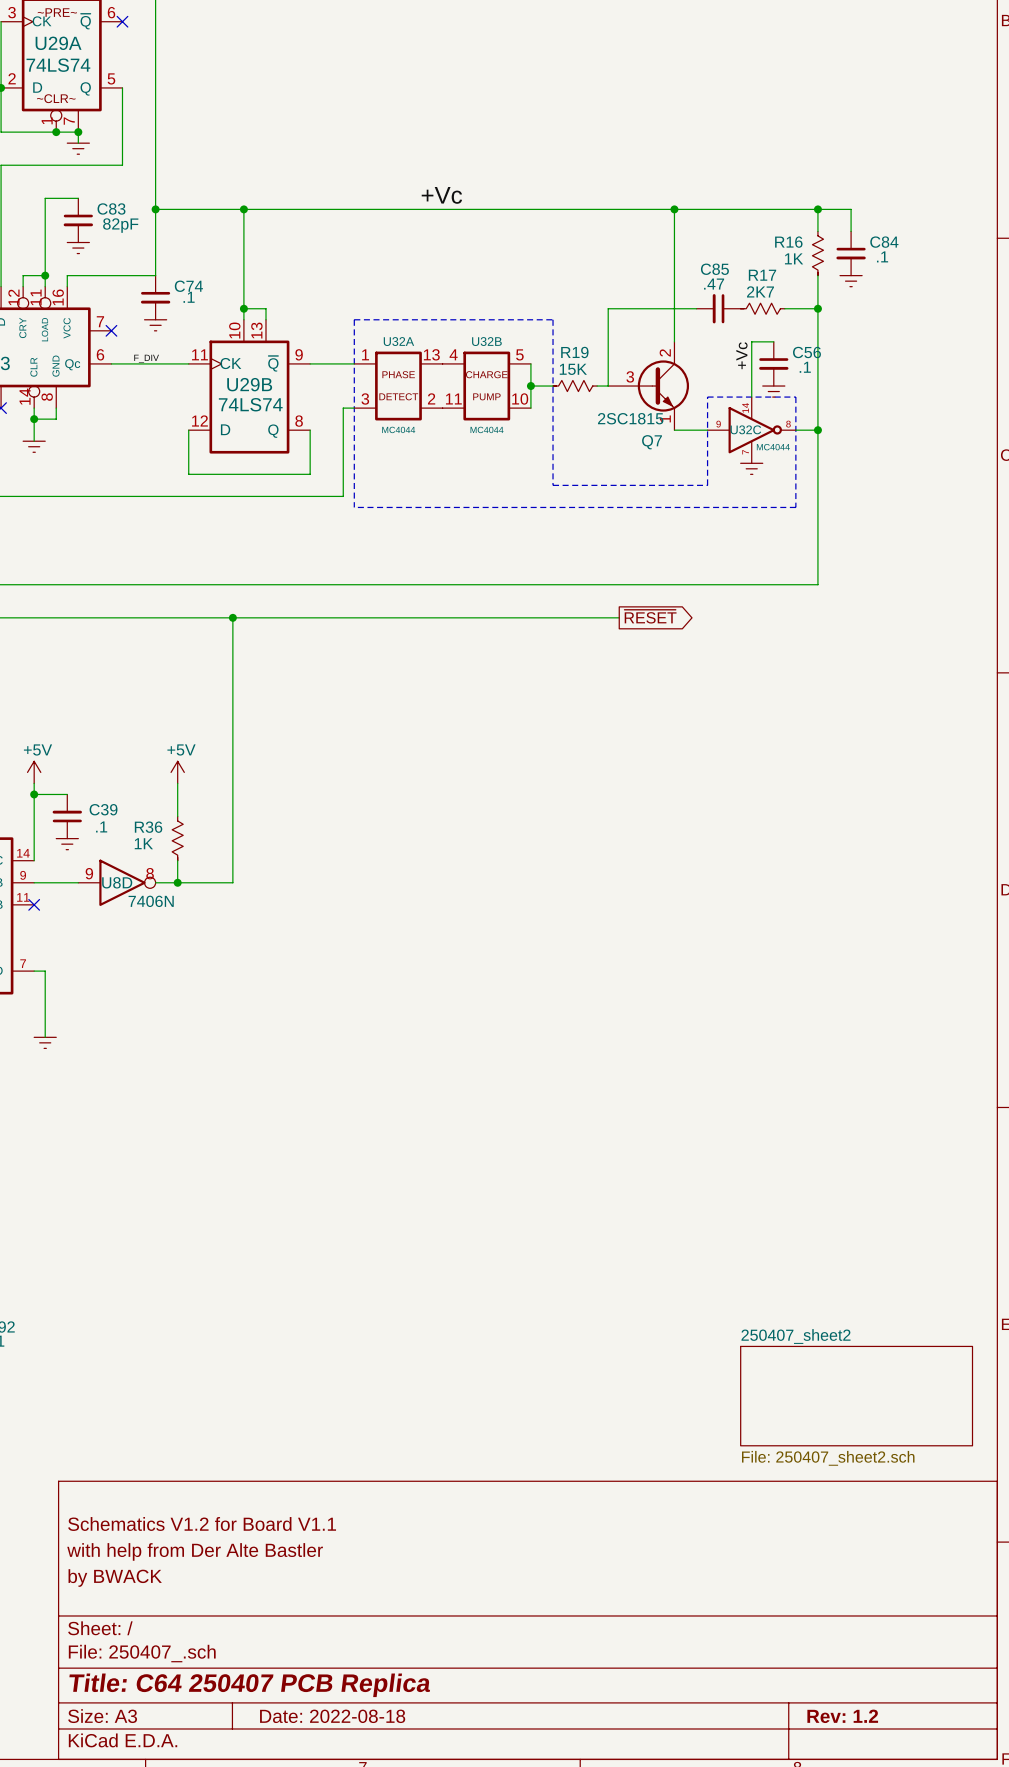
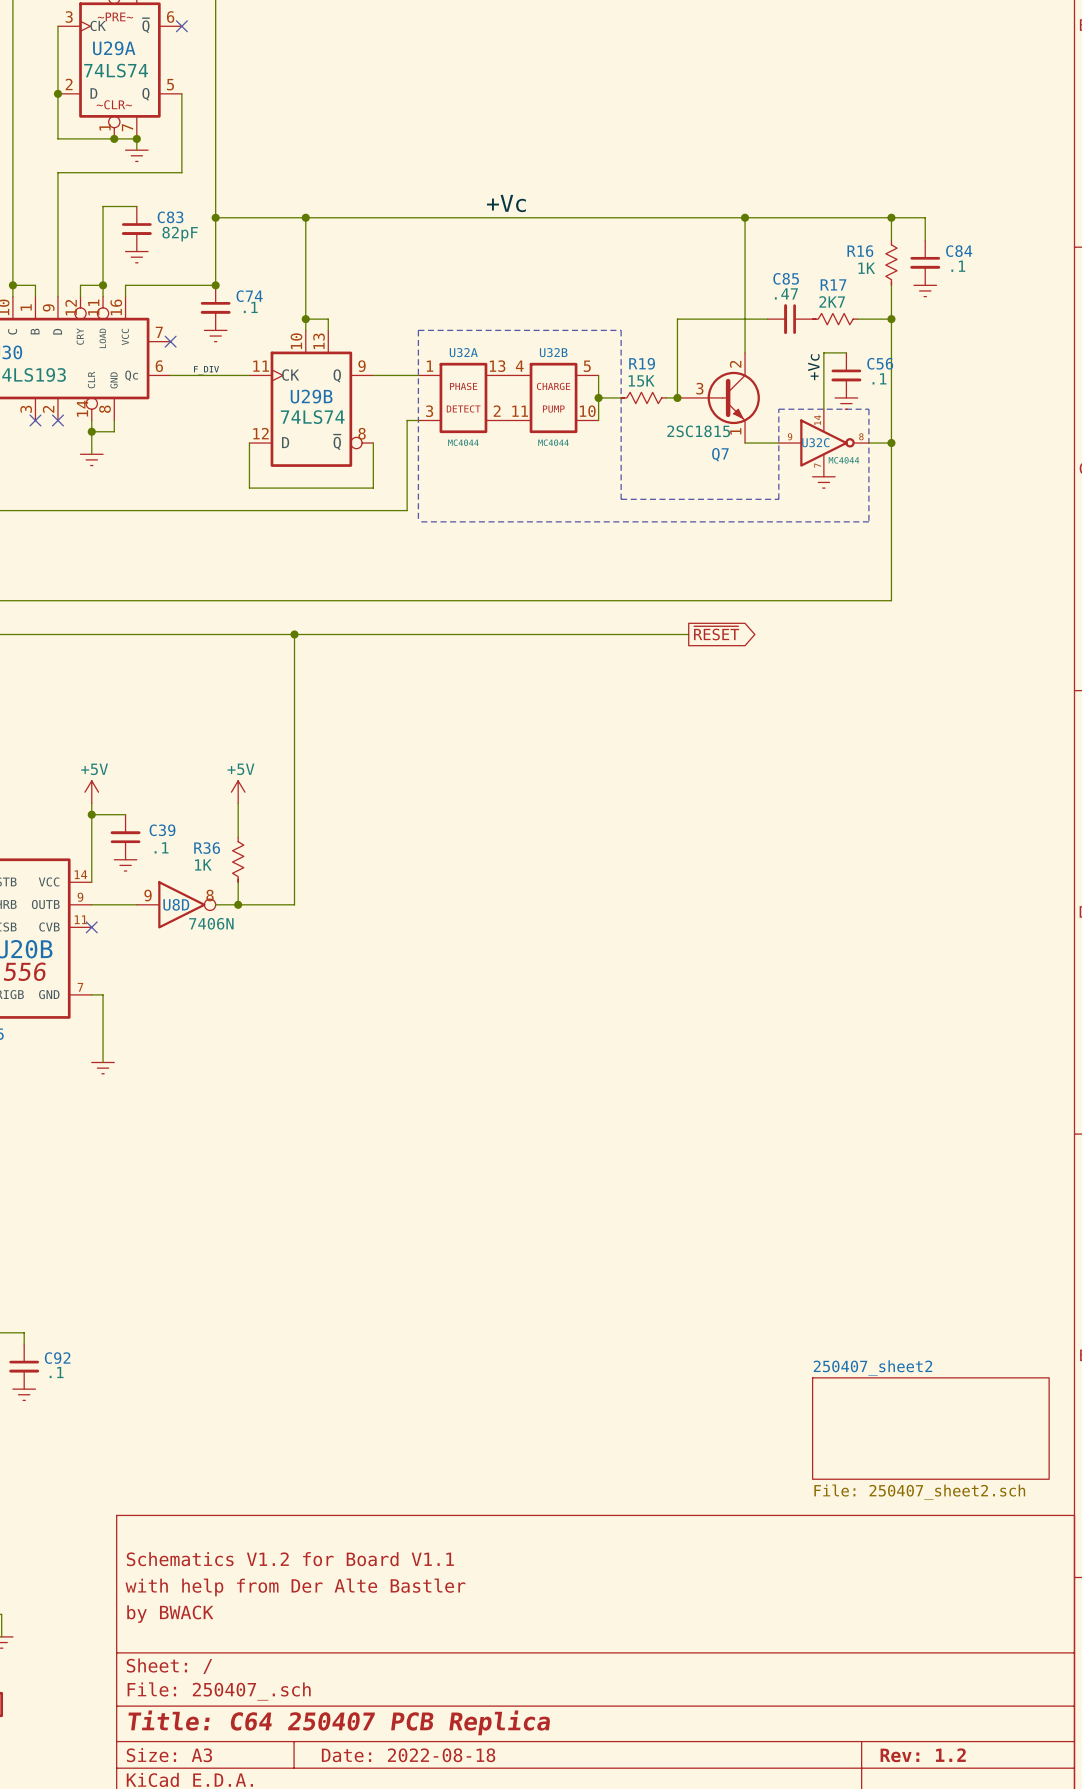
junction: none -> (215, 285)
U29B symbol: [188, 319, 311, 454] -> [249, 330, 374, 467]
junction: none -> (677, 397)

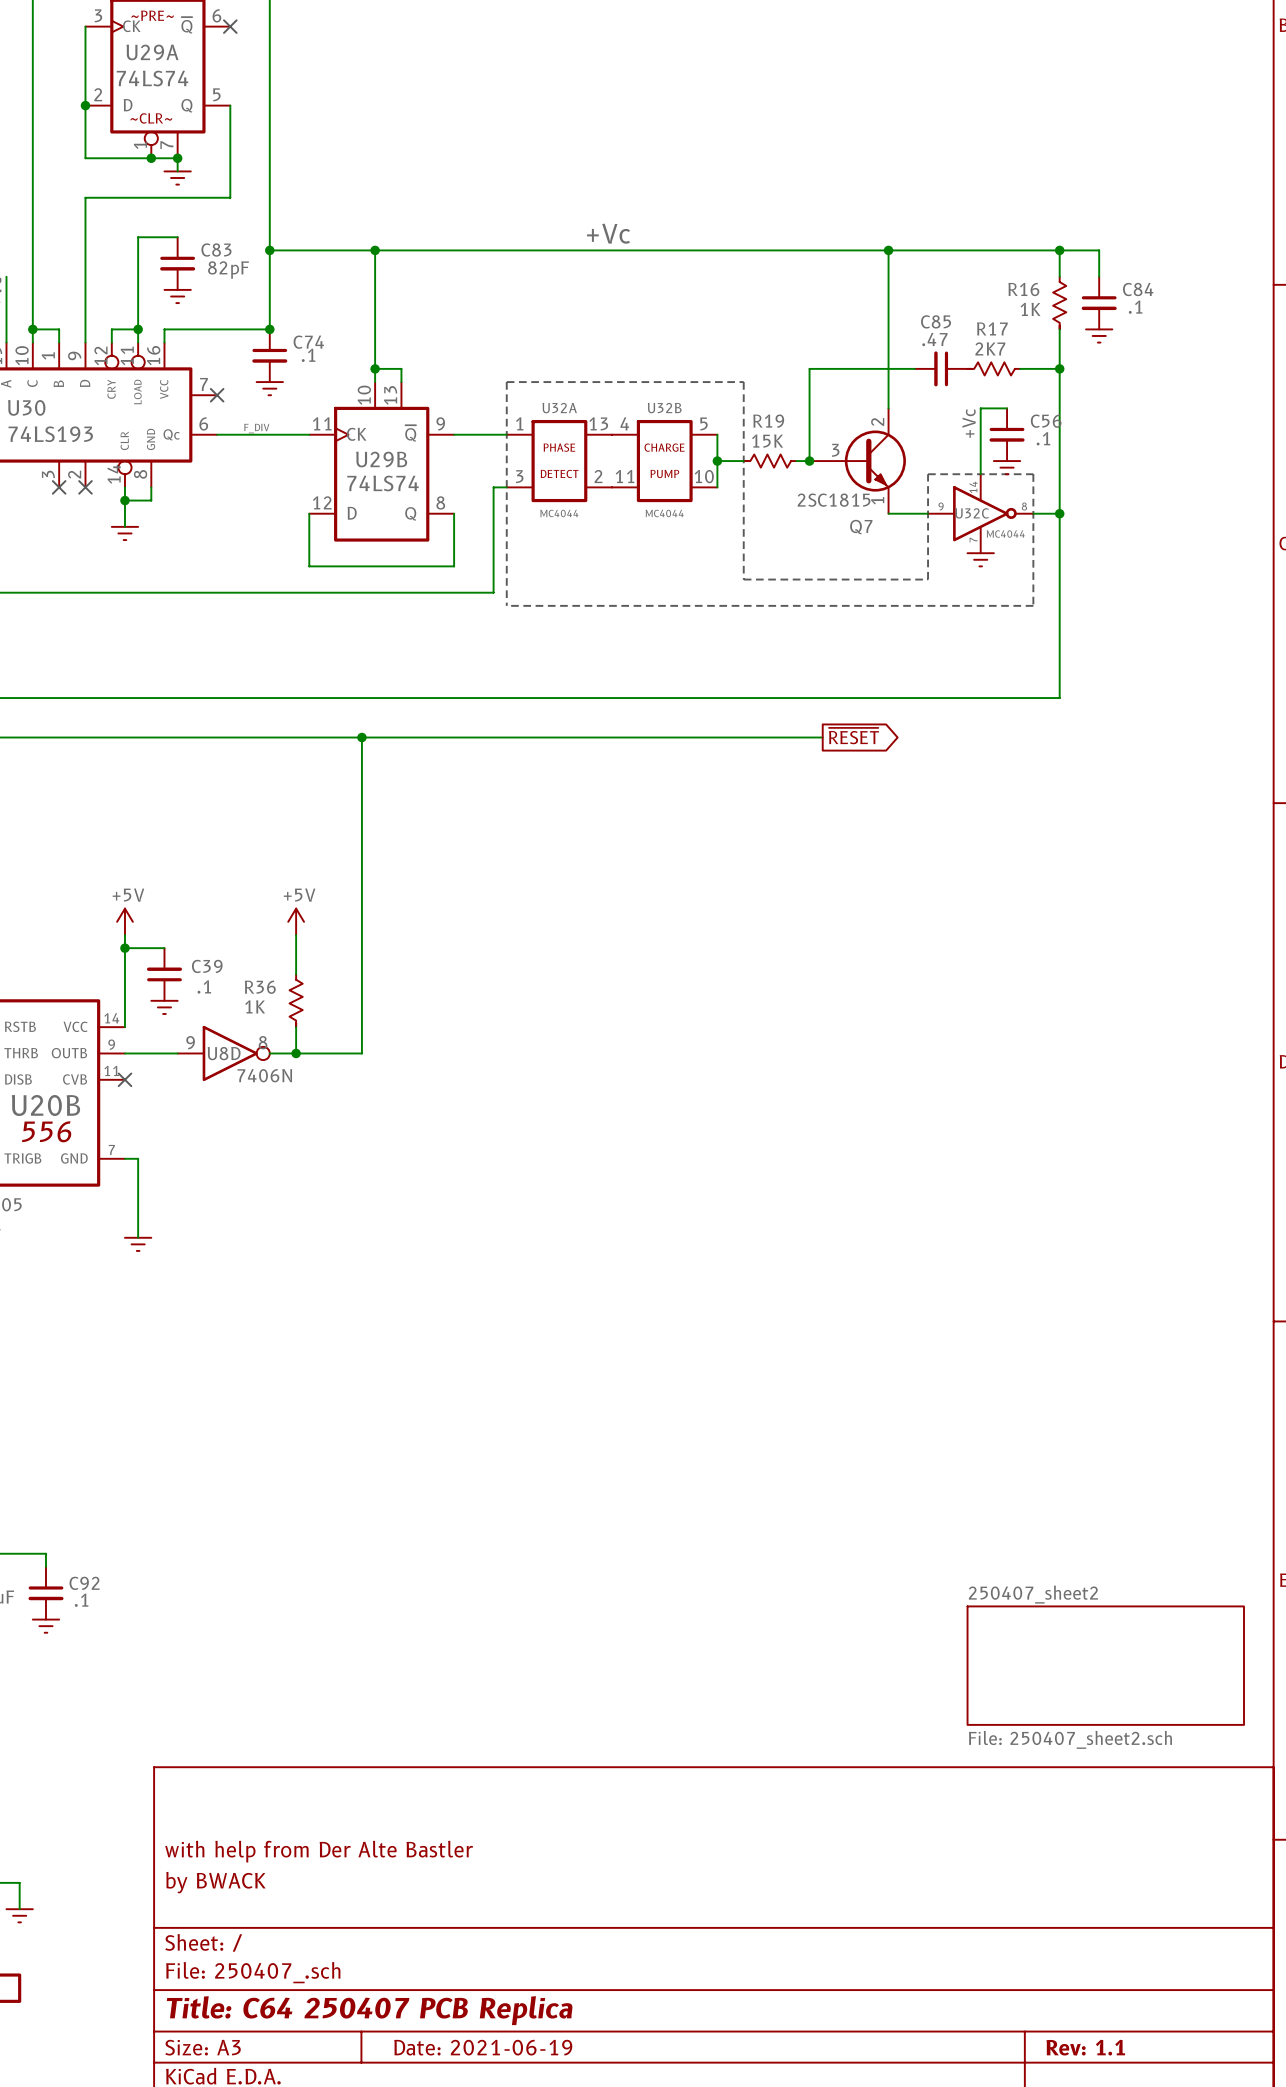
U29B symbol: [249, 330, 374, 467] -> [309, 382, 455, 542]
title block: Schematics V1.2 for Board V1.1 (290, 1559) -> none
title block: Date: 2022-08-18 (408, 1755) -> Date: 2021-06-19 (483, 2047)
title block: Rev: 1.2 (923, 1755) -> Rev: 1.1 (1085, 2047)

